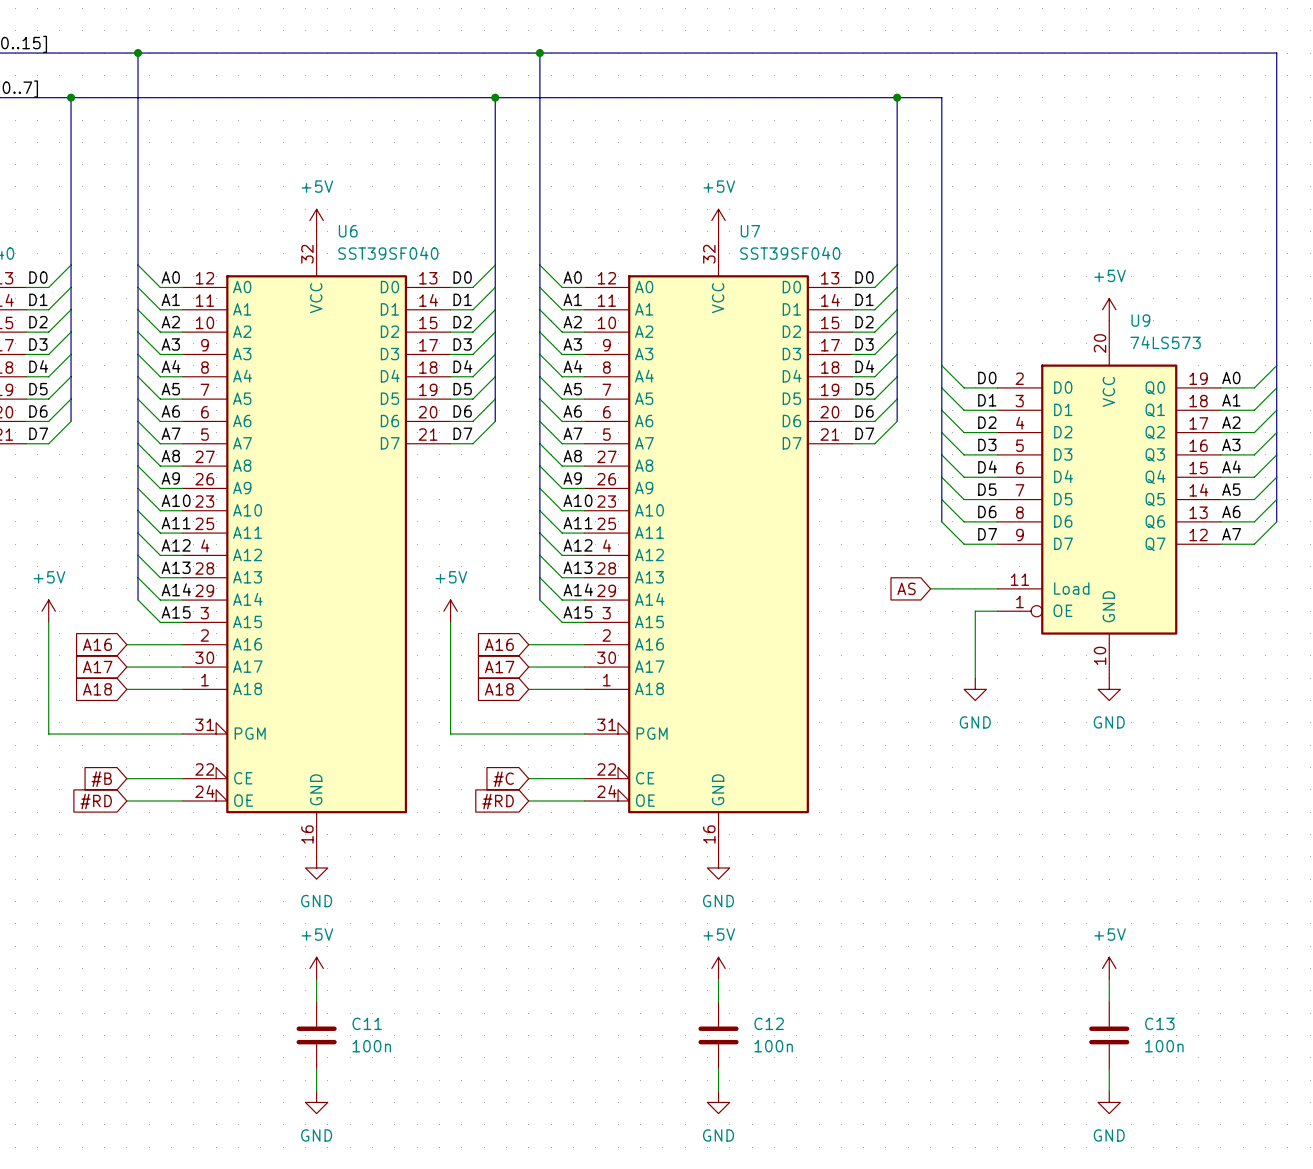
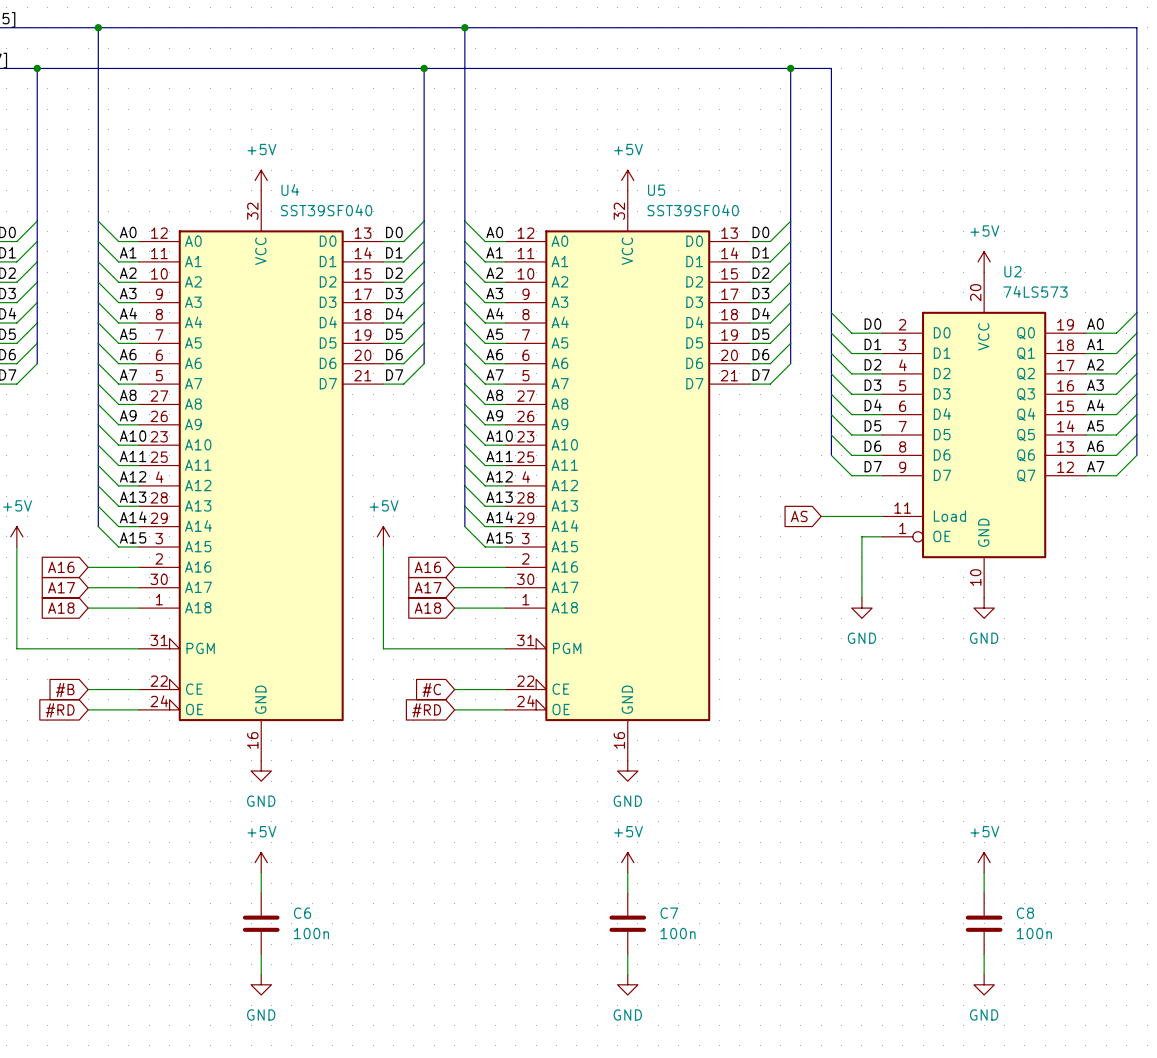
U6 name: U6 (348, 231) -> U4 (290, 190)
U7 name: U7 (750, 231) -> U5 (656, 190)
U9 name: U9 (1140, 320) -> U2 (1012, 271)
C11 name: C11 (367, 1023) -> C6 (302, 913)
C12 name: C12 (769, 1023) -> C7 (669, 913)
C13 name: C13 (1159, 1023) -> C8 (1025, 913)

